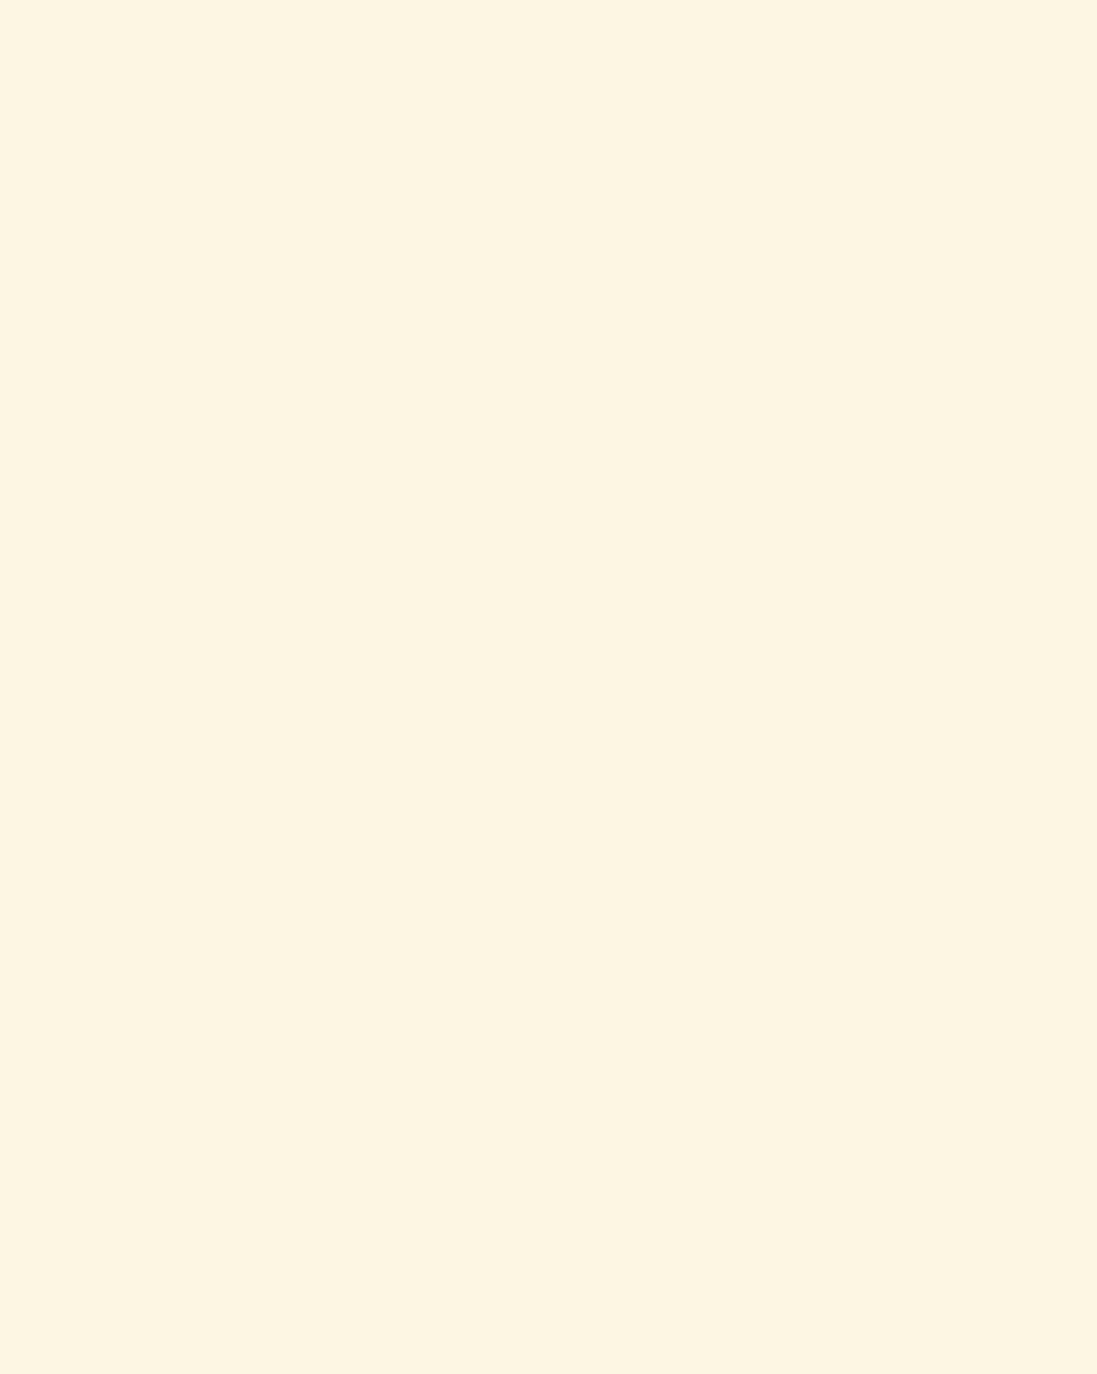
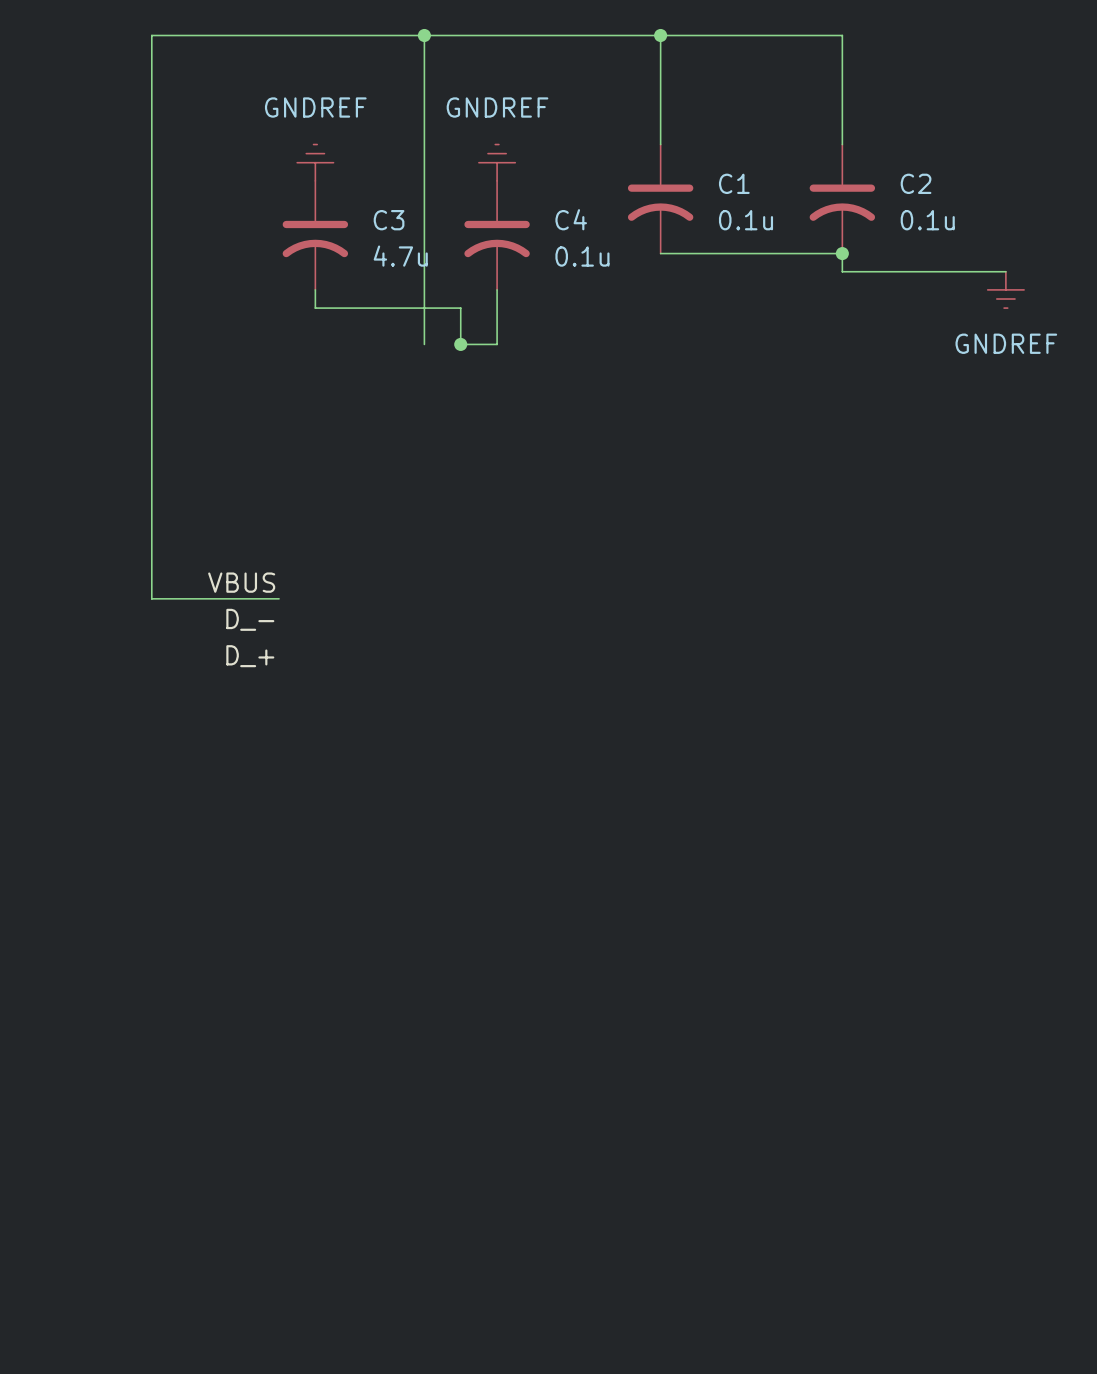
wire: none -> (424, 35) (424, 344)
junction: none -> (424, 35)
wire: none -> (660, 35) (660, 144)
junction: none -> (660, 35)
wire: none -> (842, 144) (842, 35) (151, 35) (151, 598) (279, 598)
power symbol: none -> GNDREF (315, 162)
power symbol: none -> GNDREF (497, 162)
C1: none -> 0.1u (660, 199)
C2: none -> 0.1u (842, 199)
C3: none -> 4.7u (315, 235)
C4: none -> 0.1u (497, 235)
wire: none -> (660, 253) (842, 253) (842, 271) (1005, 271)
junction: none -> (842, 253)
wire: none -> (315, 289) (315, 308) (460, 308) (460, 344) (497, 344) (497, 289)
power symbol: none -> GNDREF (1005, 289)
junction: none -> (460, 344)
label: none -> VBUS (241, 582)
label: none -> D_- (250, 619)
label: none -> D_+ (250, 656)

